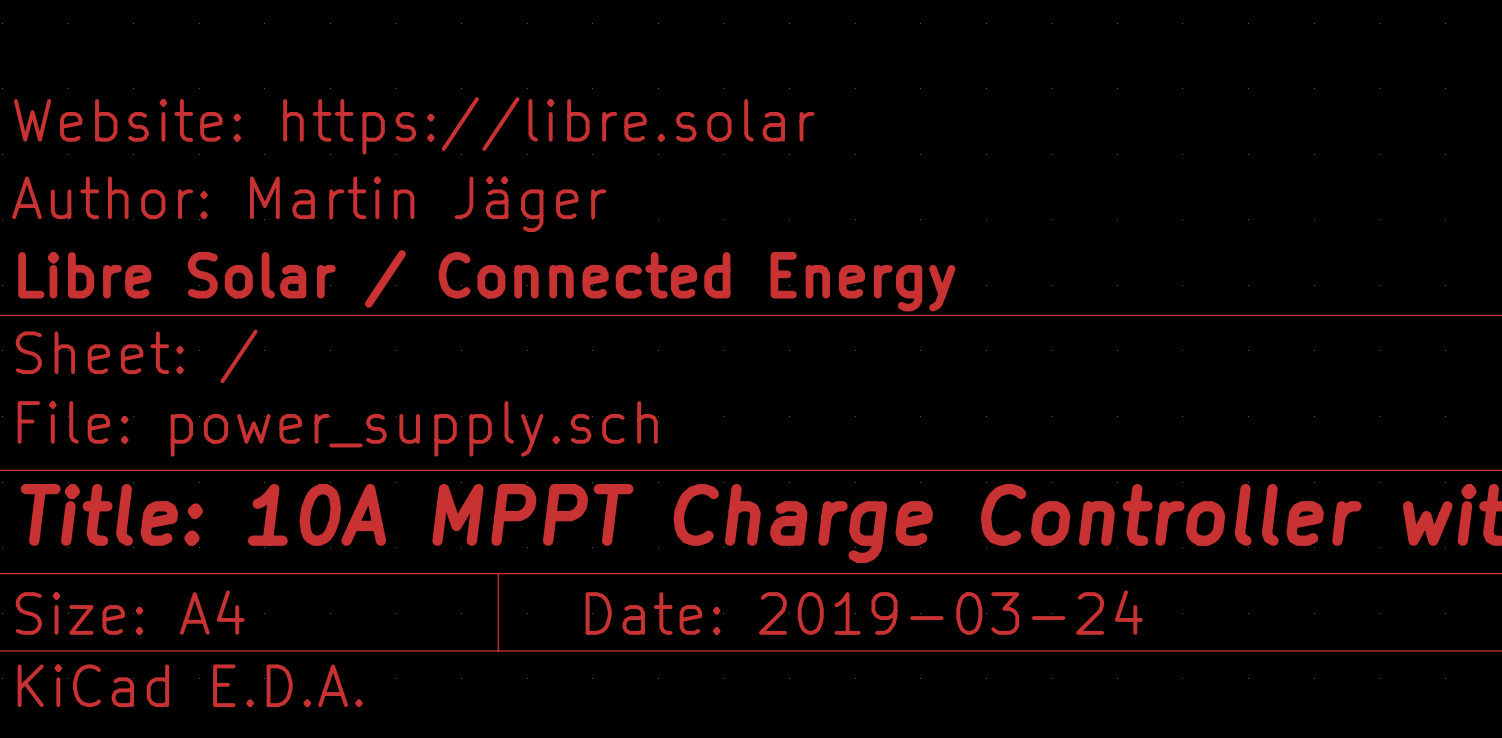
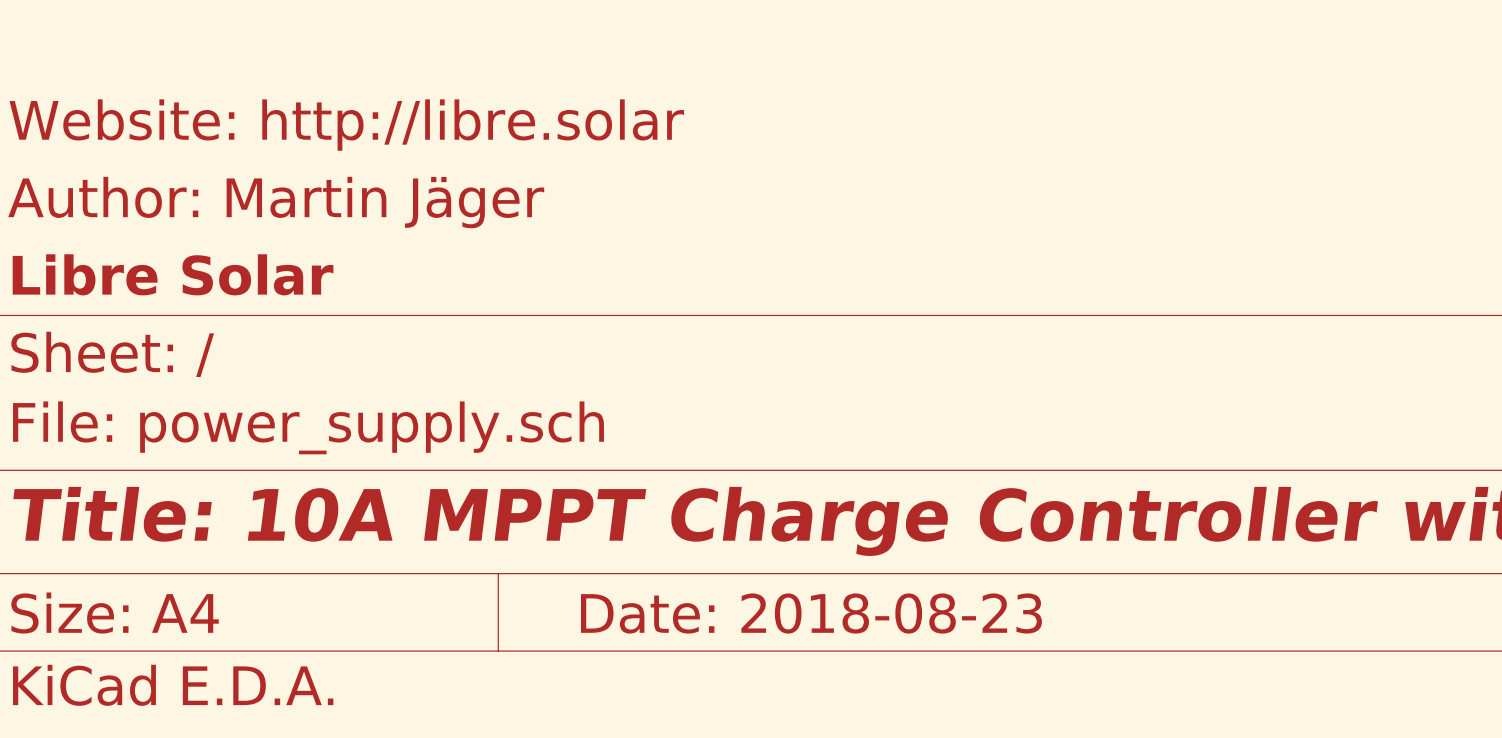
title block: Website: https://libre.solar (414, 125) -> Website: http://libre.solar (346, 125)
title block: Libre Solar / Connected Energy (486, 280) -> Libre Solar (173, 274)
title block: Date: 2019-03-24 (864, 612) -> Date: 2018-08-23 (811, 613)

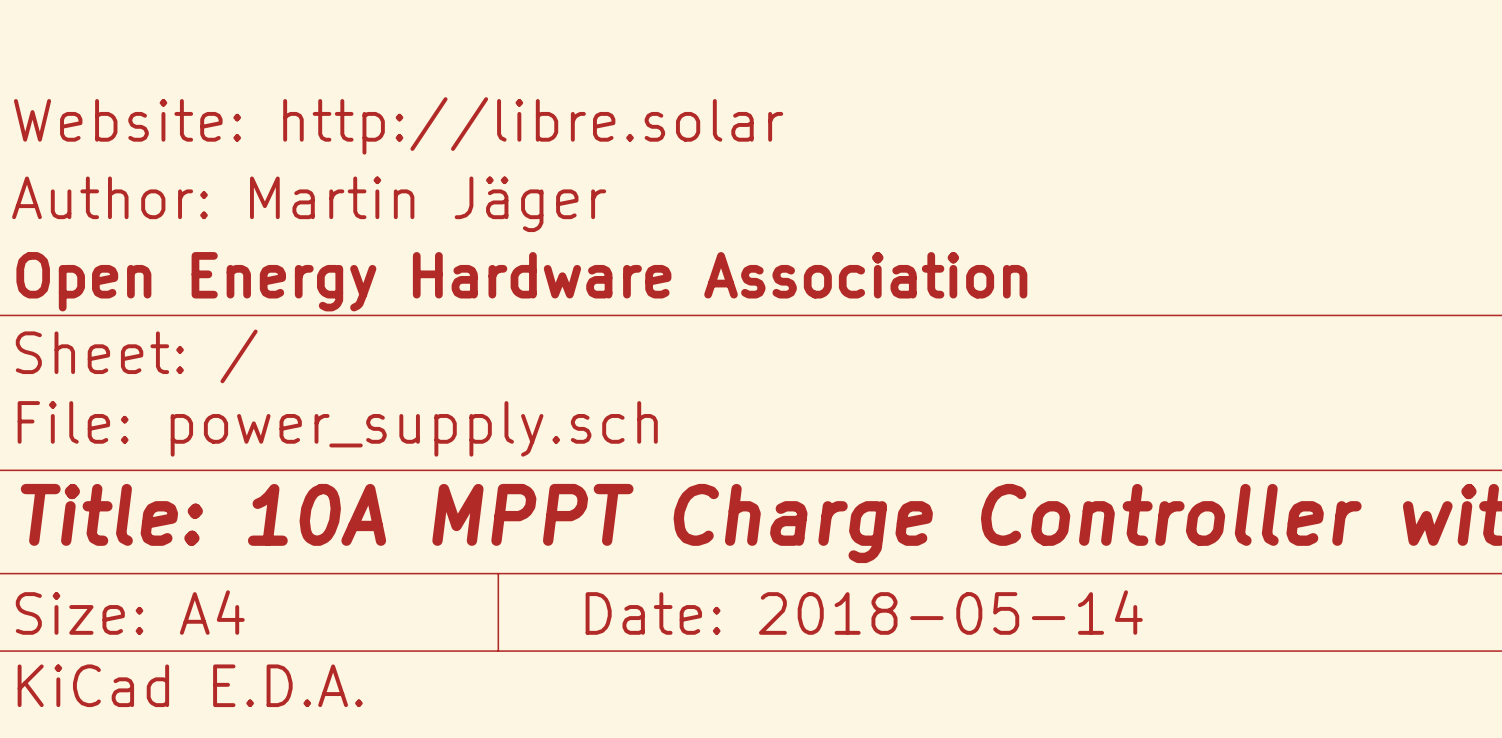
title block: Libre Solar (173, 274) -> Open Energy Hardware Association (521, 281)
title block: Date: 2018-08-23 (811, 613) -> Date: 2018-05-14 (864, 612)

